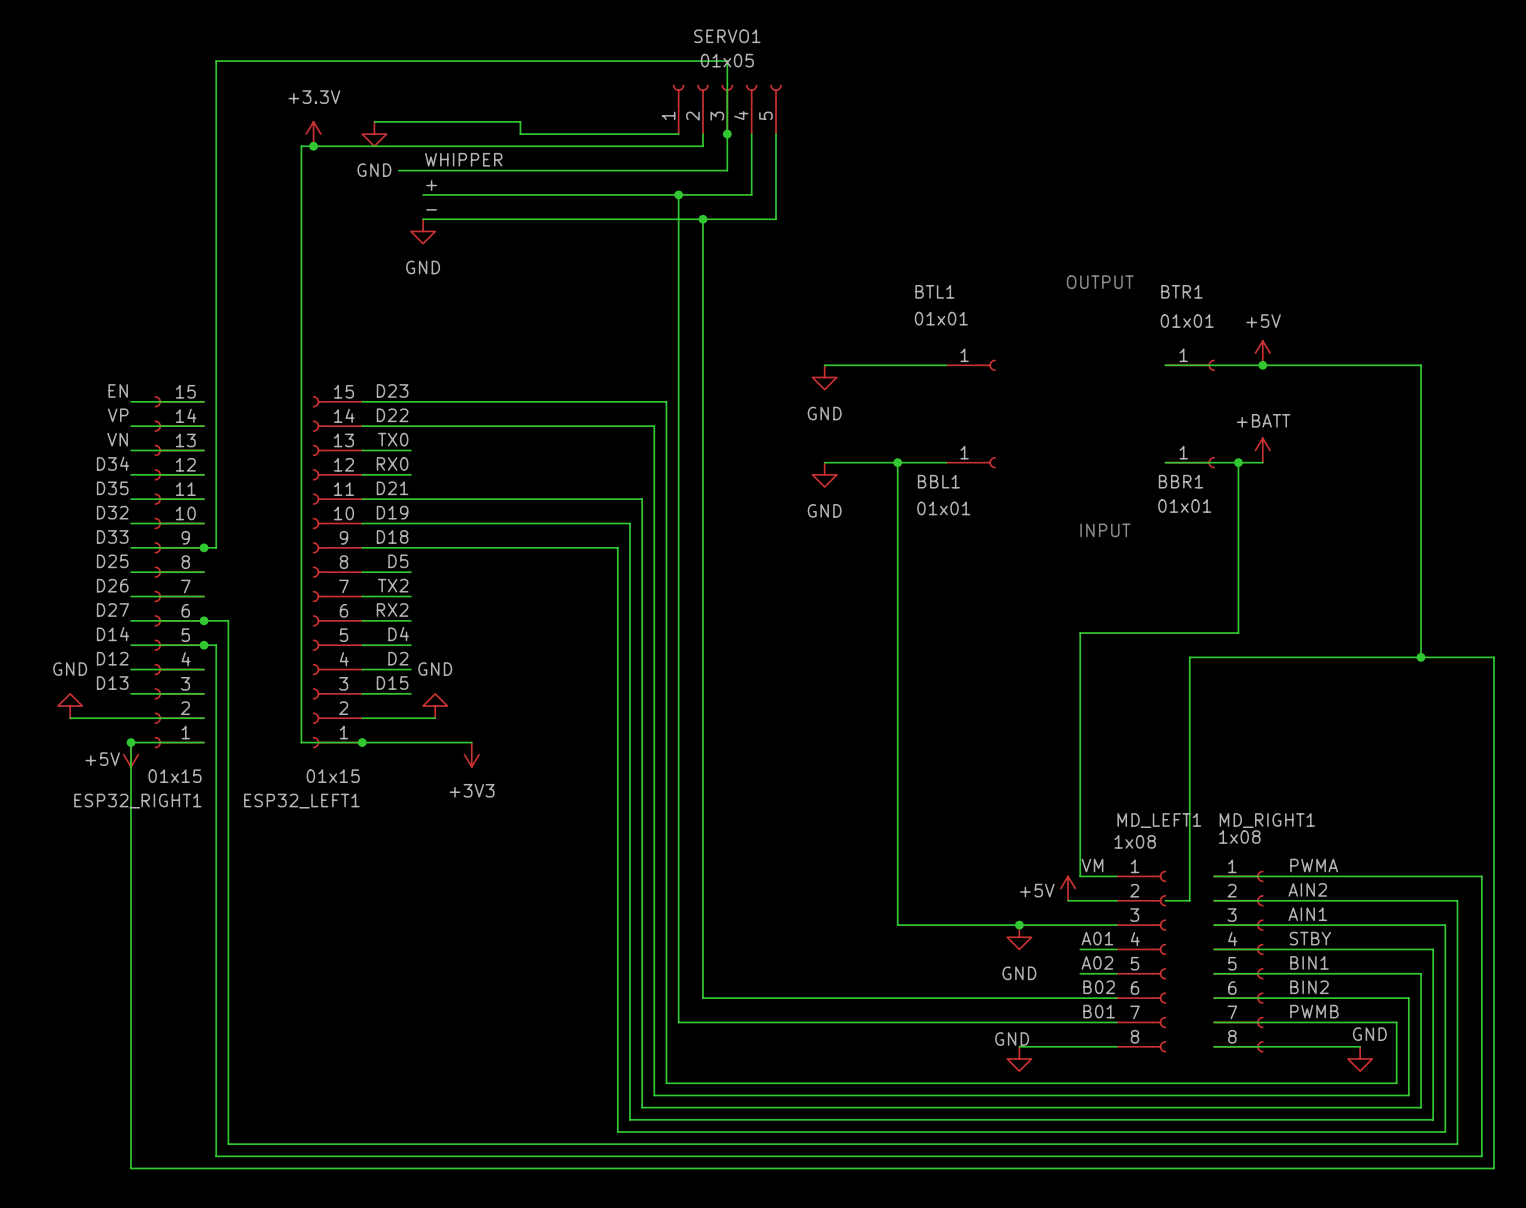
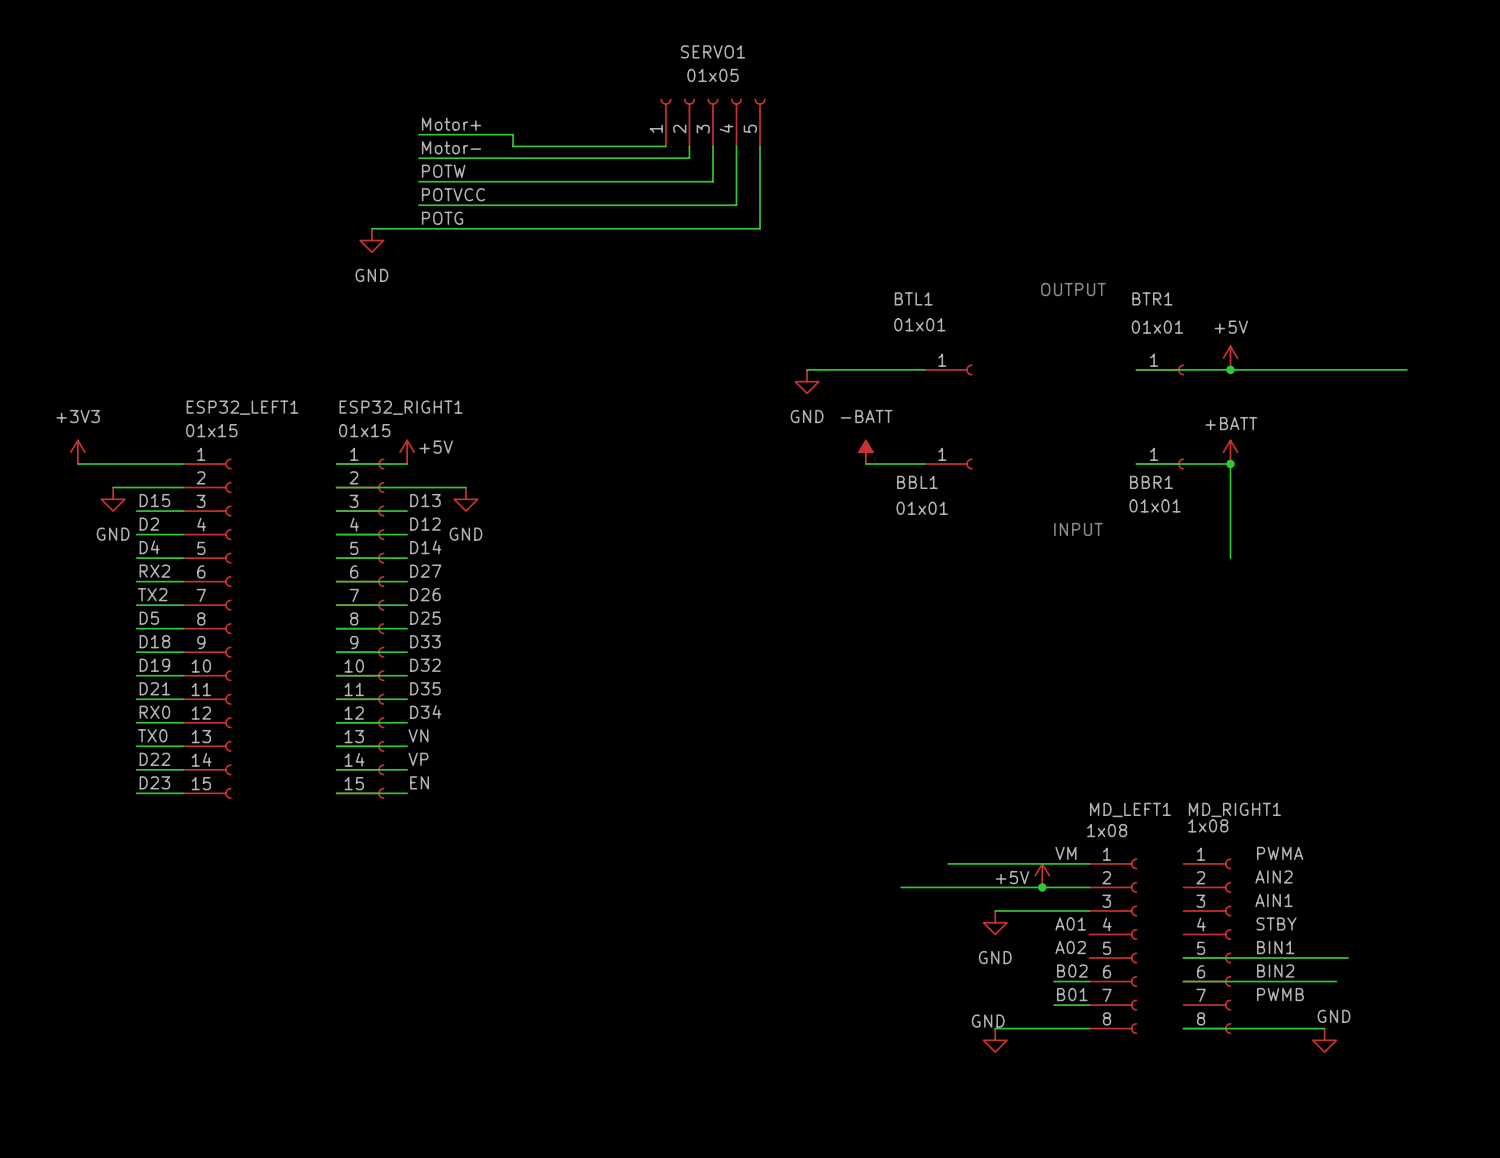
label: none -> Motor+ (451, 124)
wire: (374, 121) (423, 121) -> (371, 228) (418, 228)
power symbol: +3.3V (313, 134) -> none
power symbol: GND (374, 134) -> none
wire: (727, 134) (727, 61) (216, 61) (216, 547) (131, 547) -> none
junction: (727, 134) -> none
label: none -> Motor- (451, 147)
junction: (313, 146) -> none
wire: (423, 146) (301, 146) (301, 742) (471, 742) -> none
label: WHIPPER (463, 159) -> POTW (443, 171)
wire: (398, 170) (423, 170) -> none
label: + (431, 185) -> POTVCC (453, 194)
wire: (678, 194) (678, 1022) (1080, 1022) -> none
junction: (678, 194) -> none
label: - (431, 209) -> POTG (442, 218)
wire: (702, 219) (702, 998) (1080, 998) -> none
junction: (702, 219) -> none
power symbol: none -> GND (371, 240)
power symbol: GND (423, 231) -> none
wire: (1420, 365) (1420, 657) -> (1383, 369) (1406, 369)
label: EN (118, 390) -> none
label: D23 (392, 390) -> none
wire: (131, 401) (204, 401) -> (336, 511) (407, 511)
wire: (362, 401) (666, 401) (666, 1083) (1396, 1083) (1396, 1022) (1214, 1022) -> none
label: VP (118, 415) -> none
label: D22 (392, 415) -> none
wire: (131, 426) (204, 426) -> (336, 534) (407, 534)
wire: (362, 426) (654, 426) (654, 1095) (1408, 1095) (1408, 998) (1372, 998) -> none
label: VN (117, 439) -> none
label: TX0 (393, 439) -> none
power symbol: none -> +3V3 (77, 452)
wire: (131, 450) (204, 450) -> (336, 558) (407, 558)
wire: (362, 450) (410, 450) -> (136, 511) (183, 511)
power symbol: none -> +5V (407, 452)
power symbol: none -> -BATT (865, 452)
wire: none -> (77, 464) (183, 464)
wire: none -> (336, 464) (407, 464)
wire: (824, 462) (885, 462) -> none
wire: (897, 462) (897, 925) (1019, 925) -> none
junction: (897, 462) -> none
wire: (1238, 462) (1238, 633) (1080, 633) (1080, 876) -> (948, 863) (1054, 863)
junction position: (1238, 462) -> (1230, 464)
wire: none -> (1230, 464) (1230, 558)
label: D34 (112, 463) -> none
label: RX0 (392, 463) -> none
wire: (131, 474) (204, 474) -> (336, 581) (407, 581)
wire: (362, 474) (410, 474) -> (136, 534) (183, 534)
power symbol: GND (824, 474) -> none
wire: none -> (113, 487) (183, 487)
wire: none -> (336, 487) (465, 487)
label: D35 (112, 488) -> D15 (154, 500)
label: D21 (392, 488) -> none
power symbol: none -> GND (113, 499)
wire: (131, 499) (204, 499) -> (336, 605) (407, 605)
wire: (362, 499) (642, 499) (642, 1107) (1420, 1107) (1420, 973) (1384, 973) -> none
power symbol: none -> GND (465, 499)
label: none -> D13 (425, 500)
label: D32 (112, 512) -> D2 (149, 524)
label: D19 (392, 512) -> none
wire: (131, 523) (204, 523) -> (336, 628) (407, 628)
wire: (362, 523) (629, 523) (629, 1119) (1433, 1119) (1433, 949) (1214, 949) -> none
label: none -> D12 (425, 524)
label: D33 (112, 536) -> none
label: D18 (392, 536) -> none
junction: (204, 547) -> none
wire: (362, 547) (617, 547) (617, 1131) (1445, 1131) (1445, 925) (1214, 925) -> none
label: none -> D4 (149, 547)
label: none -> D14 (425, 547)
wire: none -> (136, 558) (183, 558)
label: D25 (112, 561) -> none
label: D5 (398, 561) -> none
wire: (131, 572) (204, 572) -> (336, 675) (407, 675)
ESP32_RIGHT1 rotation: 0° (161, 572) -> 180° (377, 628)
ESP32_LEFT1 rotation: 0° (319, 572) -> 180° (224, 628)
wire: (362, 572) (410, 572) -> (136, 628) (183, 628)
label: none -> RX2 (154, 571)
label: none -> D27 (425, 571)
wire: none -> (136, 581) (183, 581)
label: D26 (112, 585) -> none
label: TX2 (393, 585) -> none
wire: (131, 596) (204, 596) -> (336, 699) (407, 699)
wire: (362, 596) (410, 596) -> (136, 652) (183, 652)
label: none -> TX2 (152, 594)
label: none -> D26 (425, 594)
wire: none -> (136, 605) (183, 605)
label: D27 (112, 610) -> none
label: RX2 (392, 610) -> none
wire: (131, 620) (228, 620) (228, 1144) (1457, 1144) (1457, 900) (1214, 900) -> none
junction: (204, 620) -> none
wire: (362, 620) (410, 620) -> (136, 675) (183, 675)
label: none -> D5 (149, 618)
label: none -> D25 (425, 618)
label: D14 (112, 634) -> none
label: D4 (398, 634) -> none
wire: (131, 645) (216, 645) (216, 1156) (1481, 1156) (1481, 876) (1214, 876) -> none
junction: (204, 645) -> none
wire: (362, 645) (410, 645) -> (136, 699) (183, 699)
label: none -> D18 (154, 641)
label: none -> D33 (425, 641)
wire: none -> (336, 652) (407, 652)
junction: (1420, 657) -> none
label: D12 (112, 658) -> none
label: D2 (398, 658) -> D32 (425, 665)
wire: (131, 669) (204, 669) -> (336, 769) (407, 769)
wire: (362, 669) (410, 669) -> (136, 722) (183, 722)
label: none -> D19 (154, 665)
label: D13 (112, 683) -> none
label: D15 (392, 683) -> D35 (425, 688)
wire: (131, 693) (204, 693) -> (336, 793) (407, 793)
wire: (362, 693) (410, 693) -> (136, 746) (183, 746)
label: none -> D21 (154, 688)
power symbol: GND (70, 706) -> none
power symbol: GND (435, 706) -> none
wire: (70, 718) (204, 718) -> none
wire: (362, 718) (435, 718) -> (336, 722) (407, 722)
label: none -> RX0 (154, 712)
label: none -> D34 (425, 712)
junction: (131, 742) -> none
wire: (204, 742) (131, 742) (131, 1168) (1493, 1168) (1493, 657) (1189, 657) (1189, 900) (1165, 900) -> none
junction: (362, 742) -> none
label: none -> TX0 (152, 735)
label: none -> VN (418, 735)
power symbol: +5V (131, 754) -> none
wire: none -> (336, 746) (407, 746)
power symbol: +3V3 (471, 754) -> none
label: none -> D22 (154, 759)
label: none -> VP (418, 759)
wire: none -> (136, 769) (183, 769)
label: none -> D23 (154, 782)
label: none -> EN (419, 782)
wire: none -> (136, 793) (183, 793)
wire: none -> (901, 887) (1042, 887)
junction position: (1019, 925) -> (1042, 887)
wire: (1080, 949) (1116, 949) -> none
wire: (1080, 973) (1116, 973) -> none

